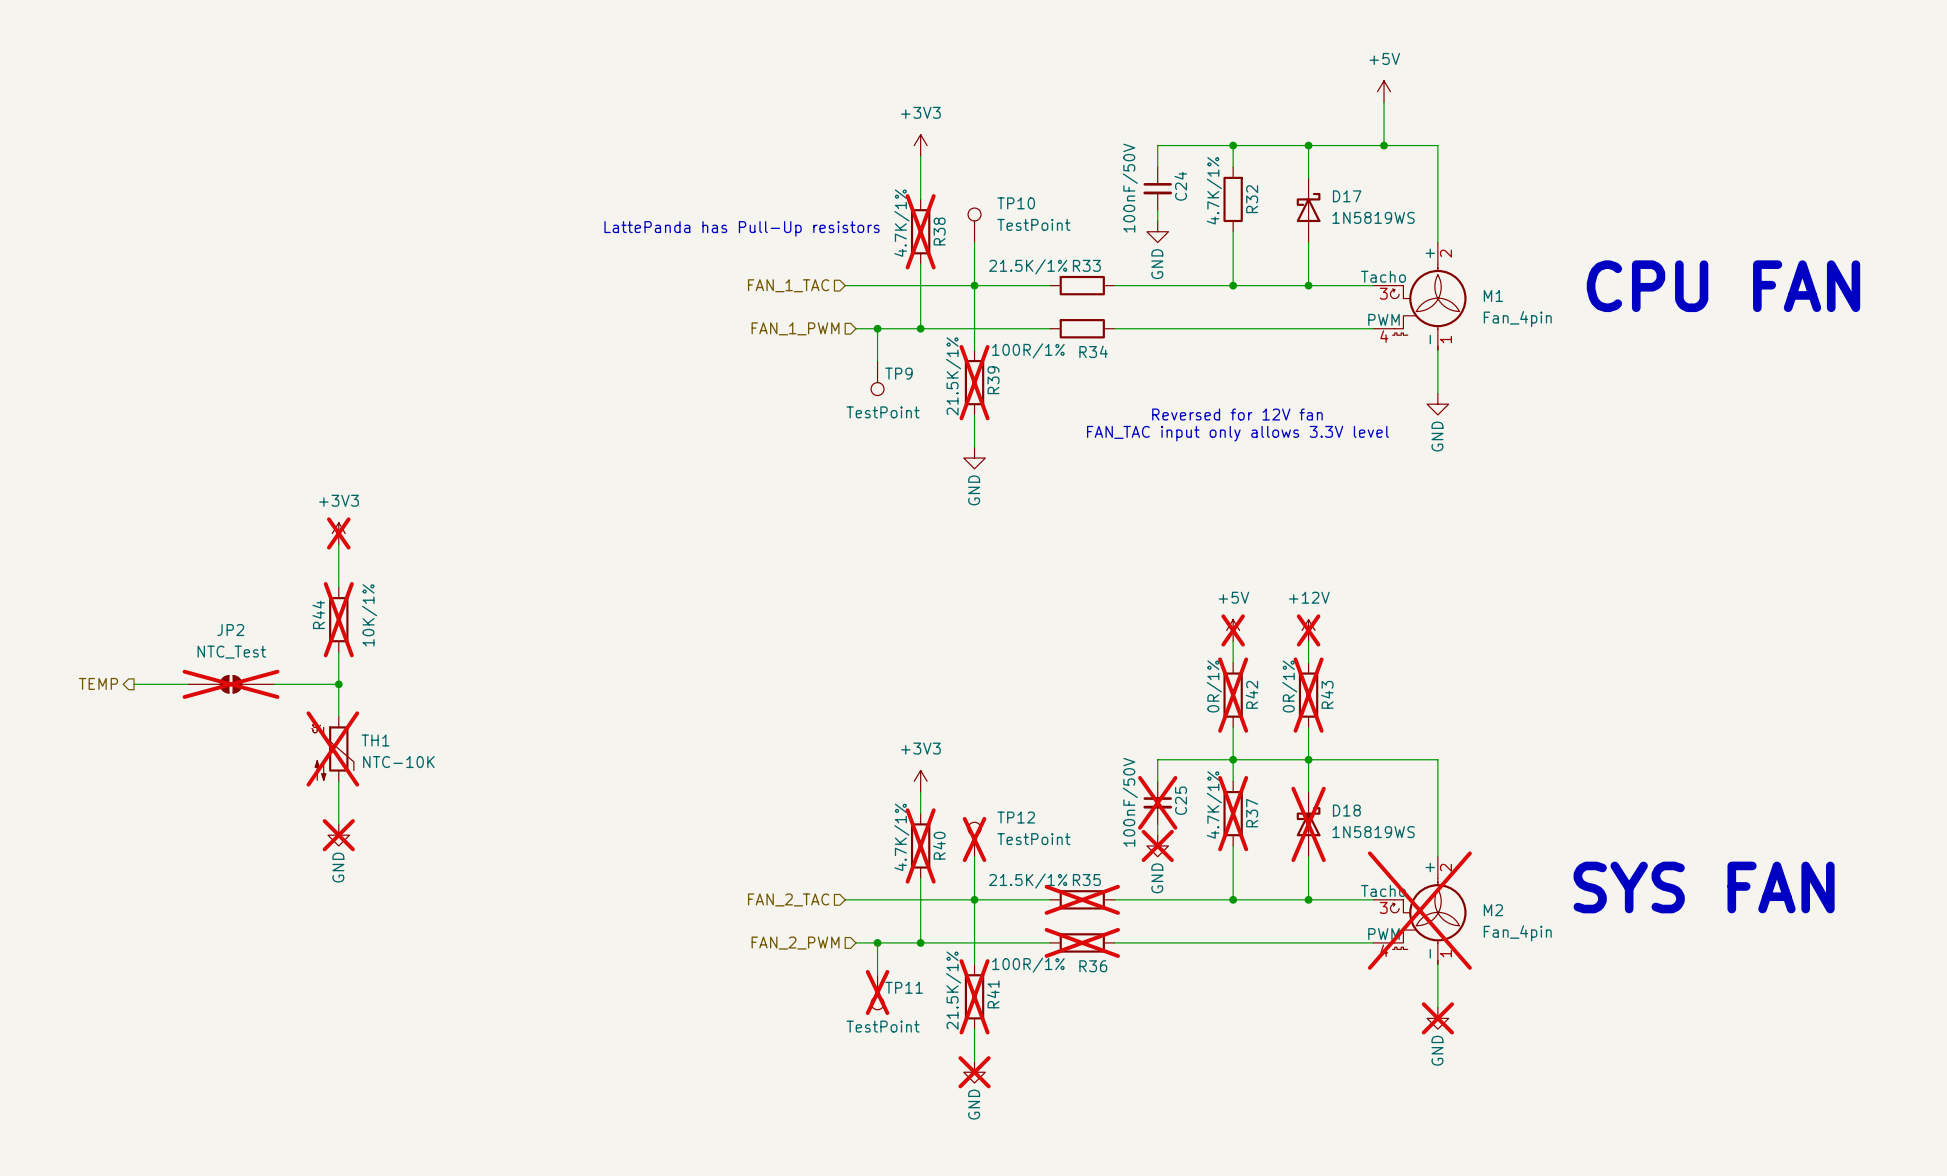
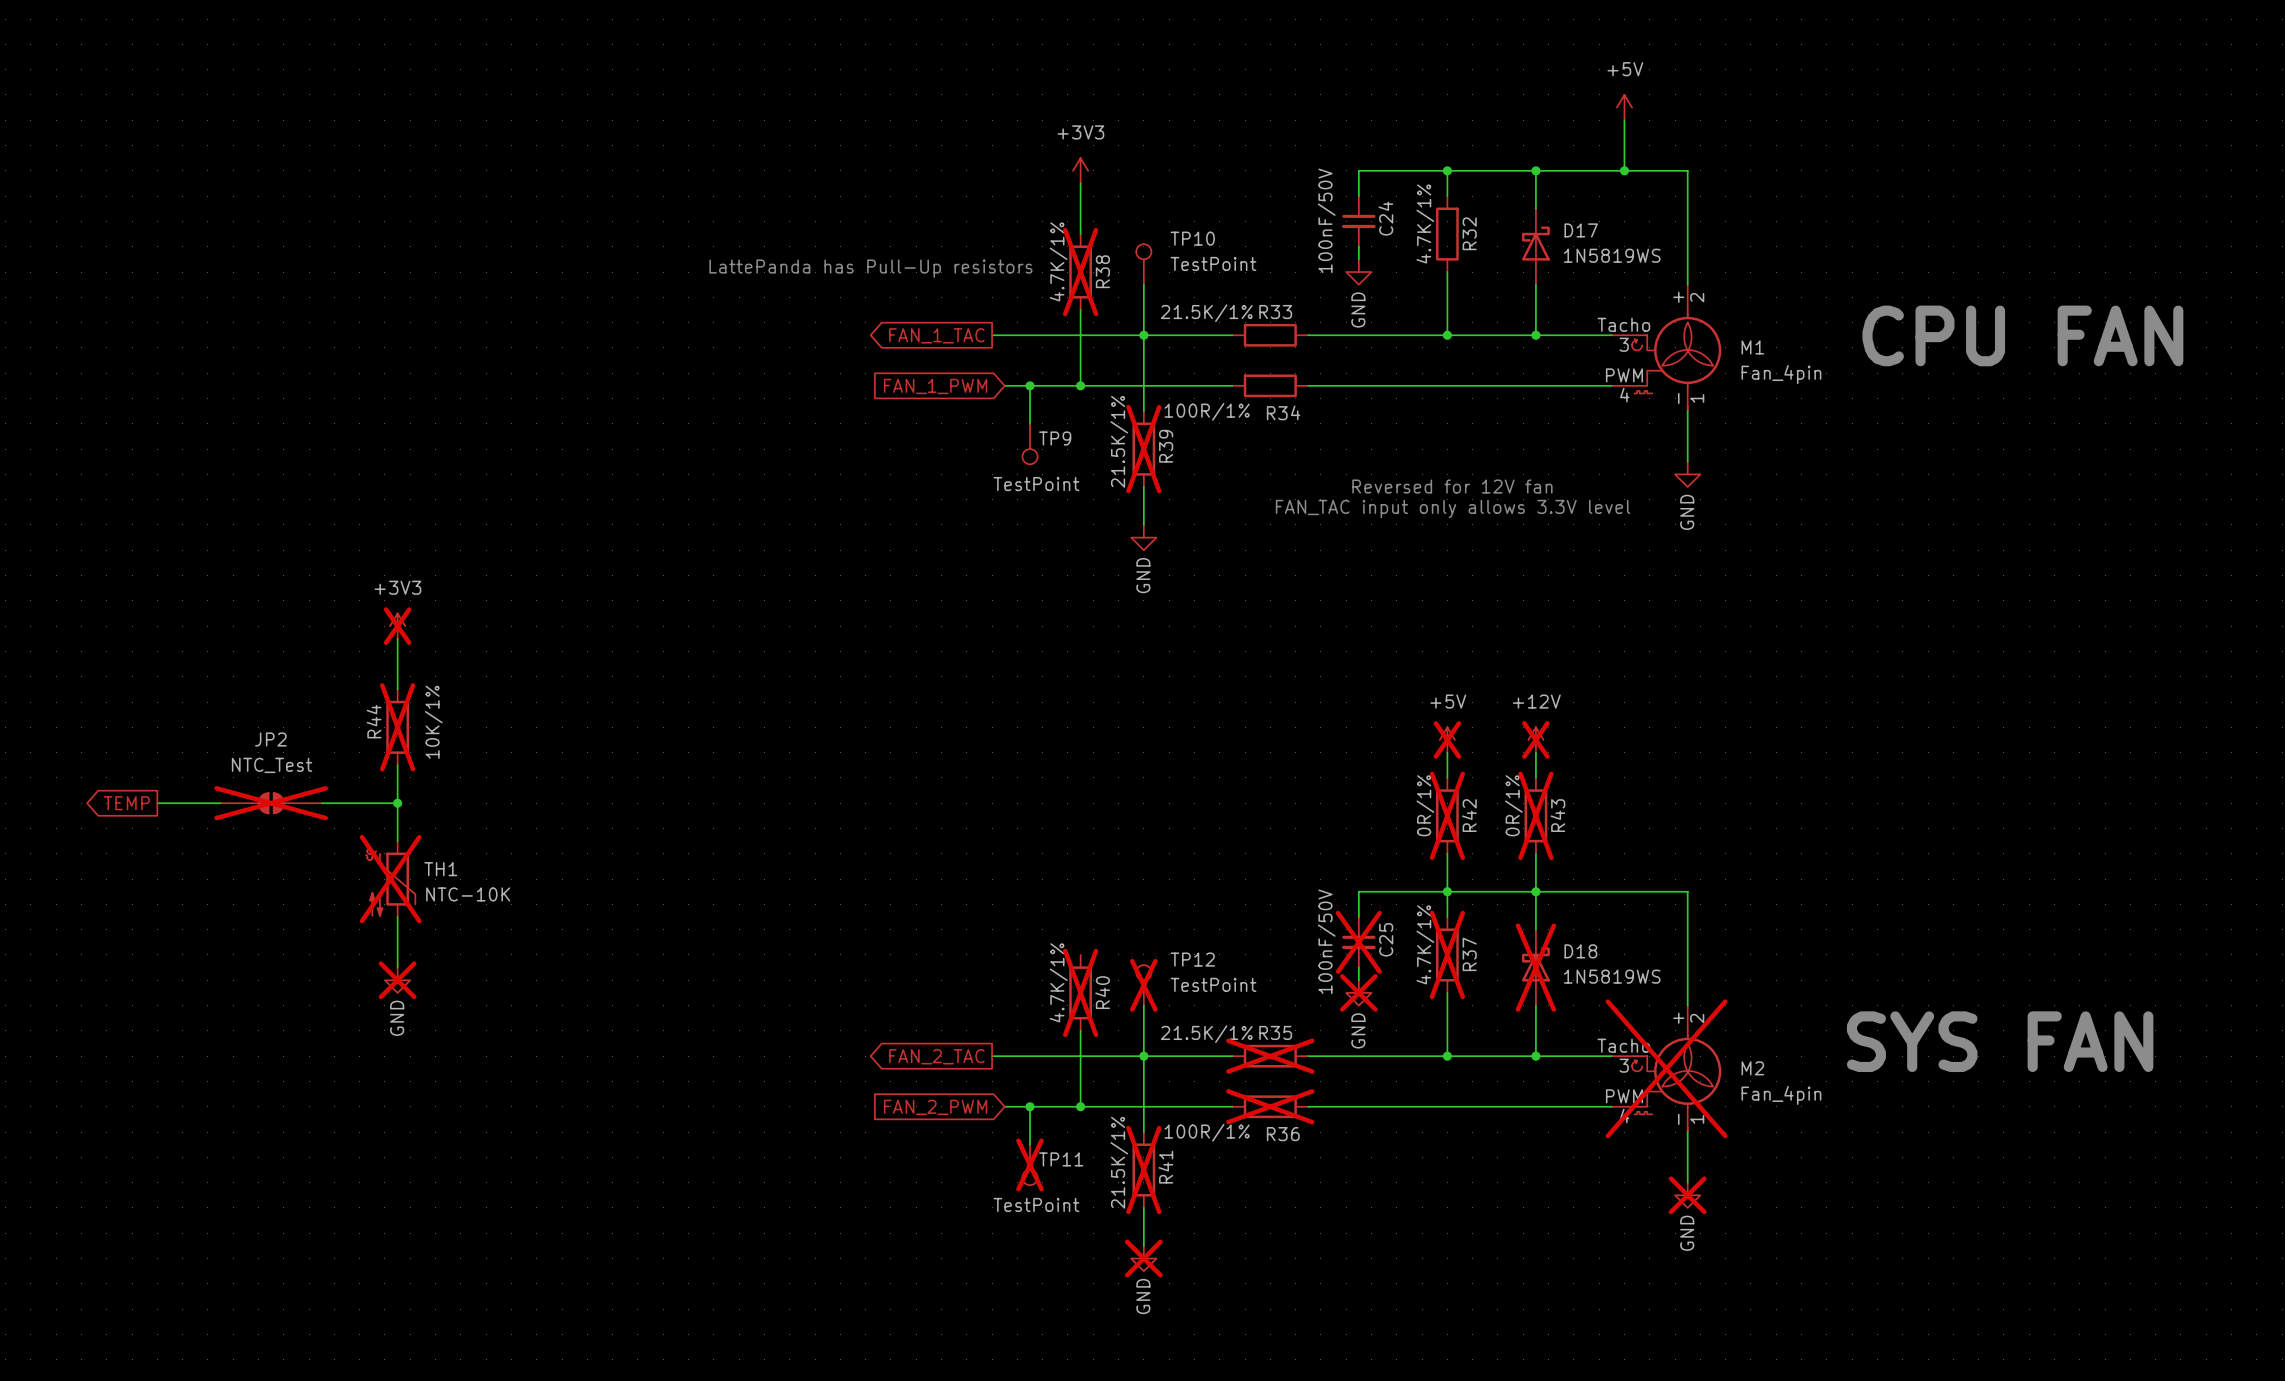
hierarchical label: FAN_1_TAC (788, 285) -> none
global label: none -> FAN_1_TAC (936, 335)
hierarchical label: FAN_1_PWM (795, 328) -> none
global label: none -> FAN_1_PWM (935, 386)
hierarchical label: TEMP (98, 683) -> none
global label: none -> TEMP (126, 803)
power symbol: +3V3 (920, 781) -> none
wire: (920, 792) (920, 813) -> none
hierarchical label: FAN_2_TAC (788, 899) -> none
global label: none -> FAN_2_TAC (936, 1056)
hierarchical label: FAN_2_PWM (795, 943) -> none
global label: none -> FAN_2_PWM (935, 1107)

